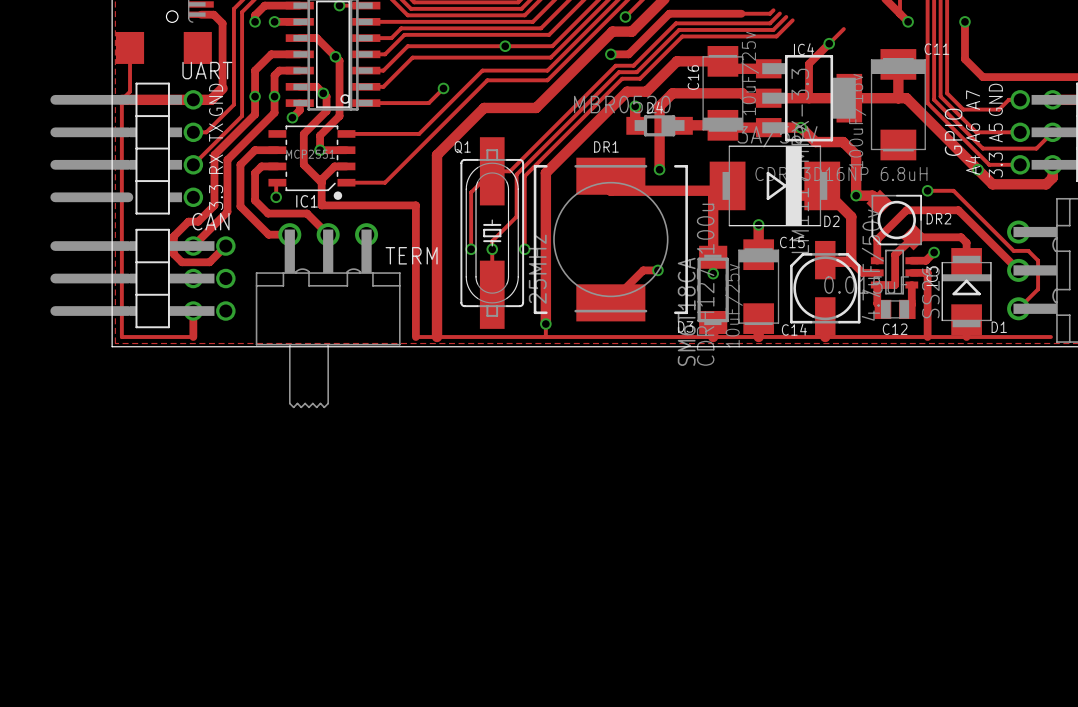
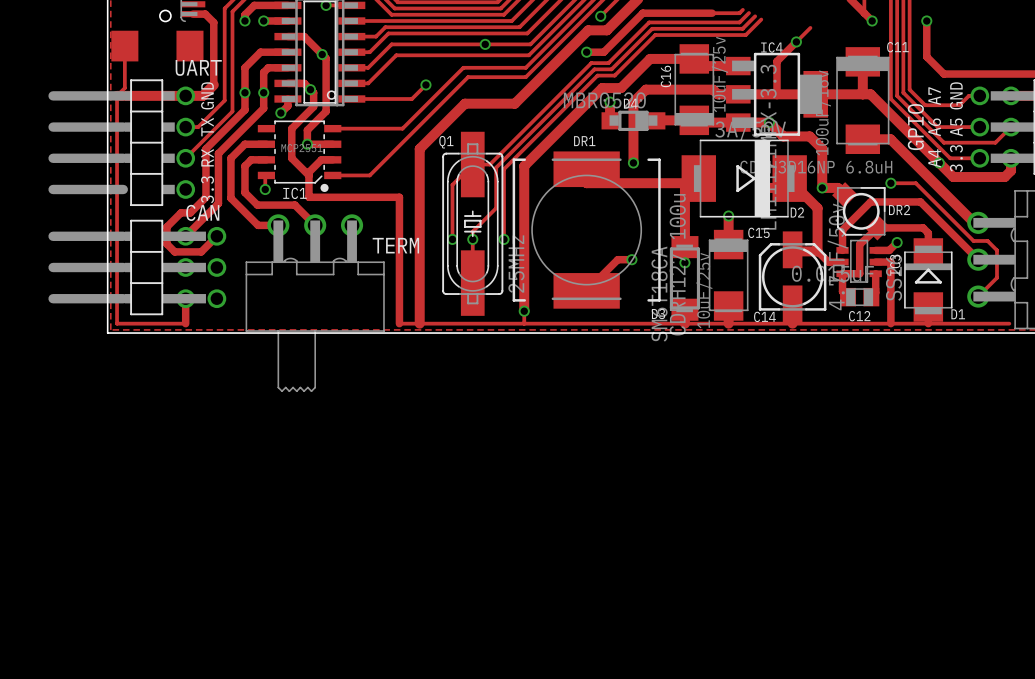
track: none -> (862, 139) (890, 139) (974, 222) (978, 222)

